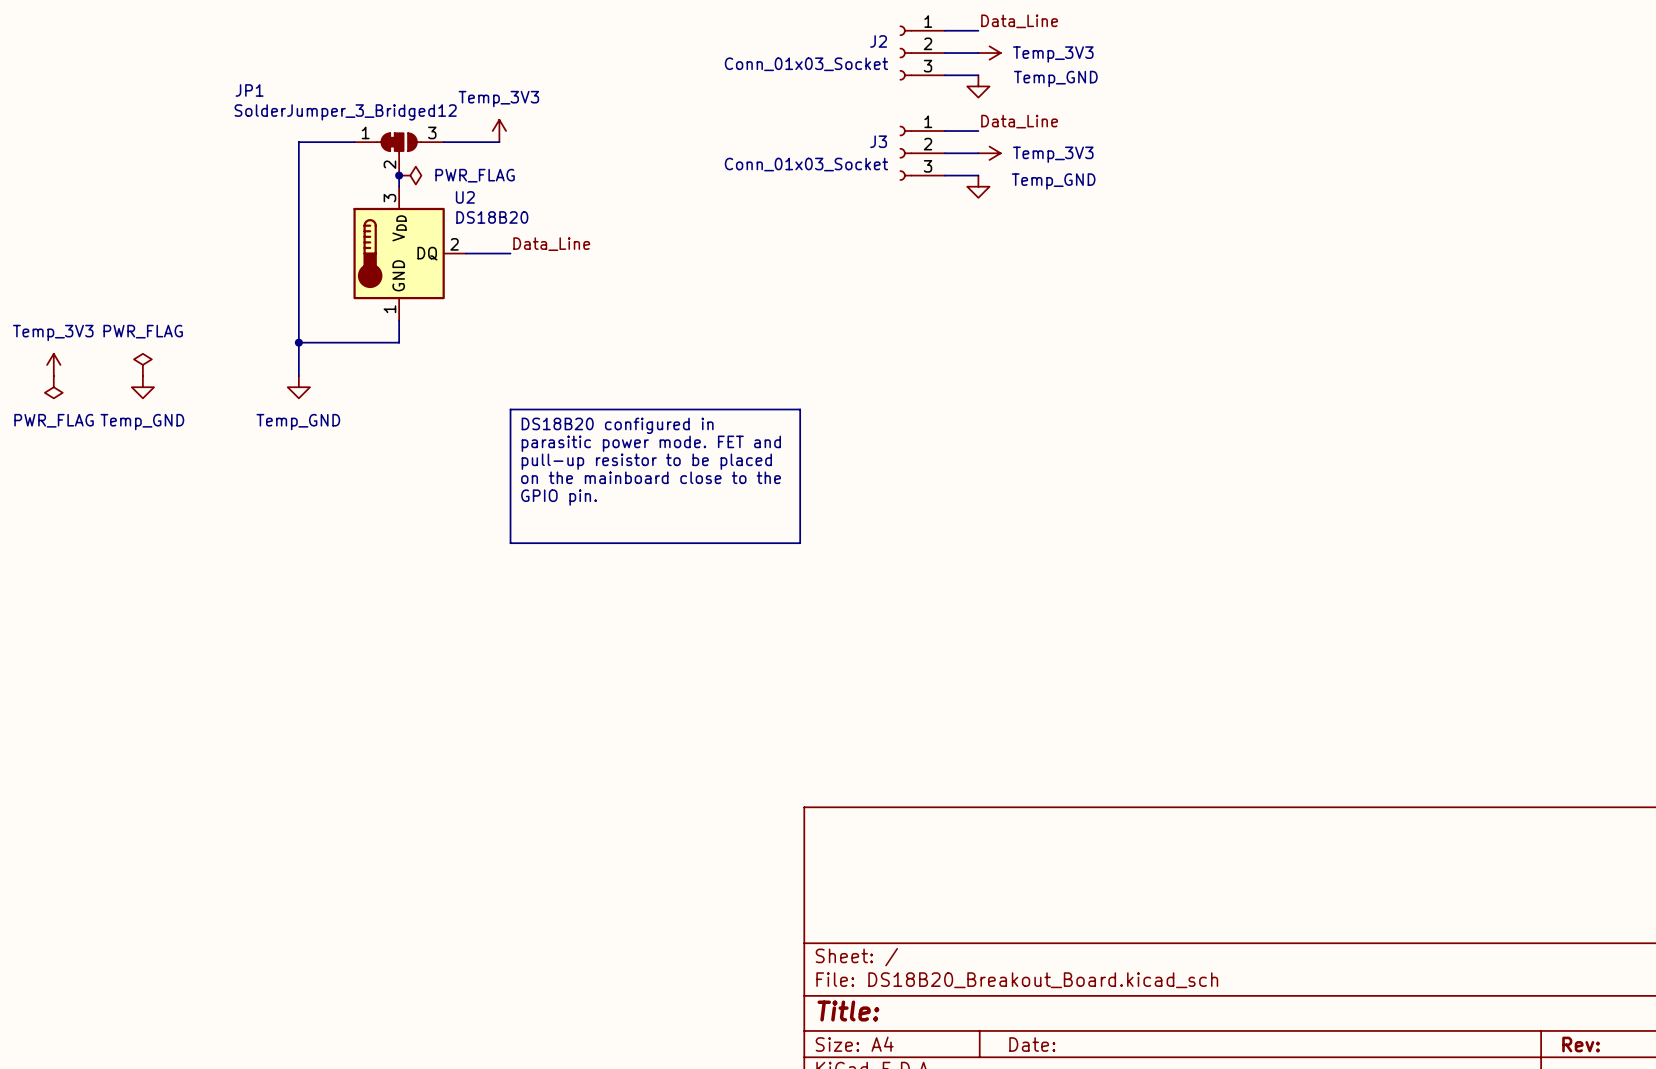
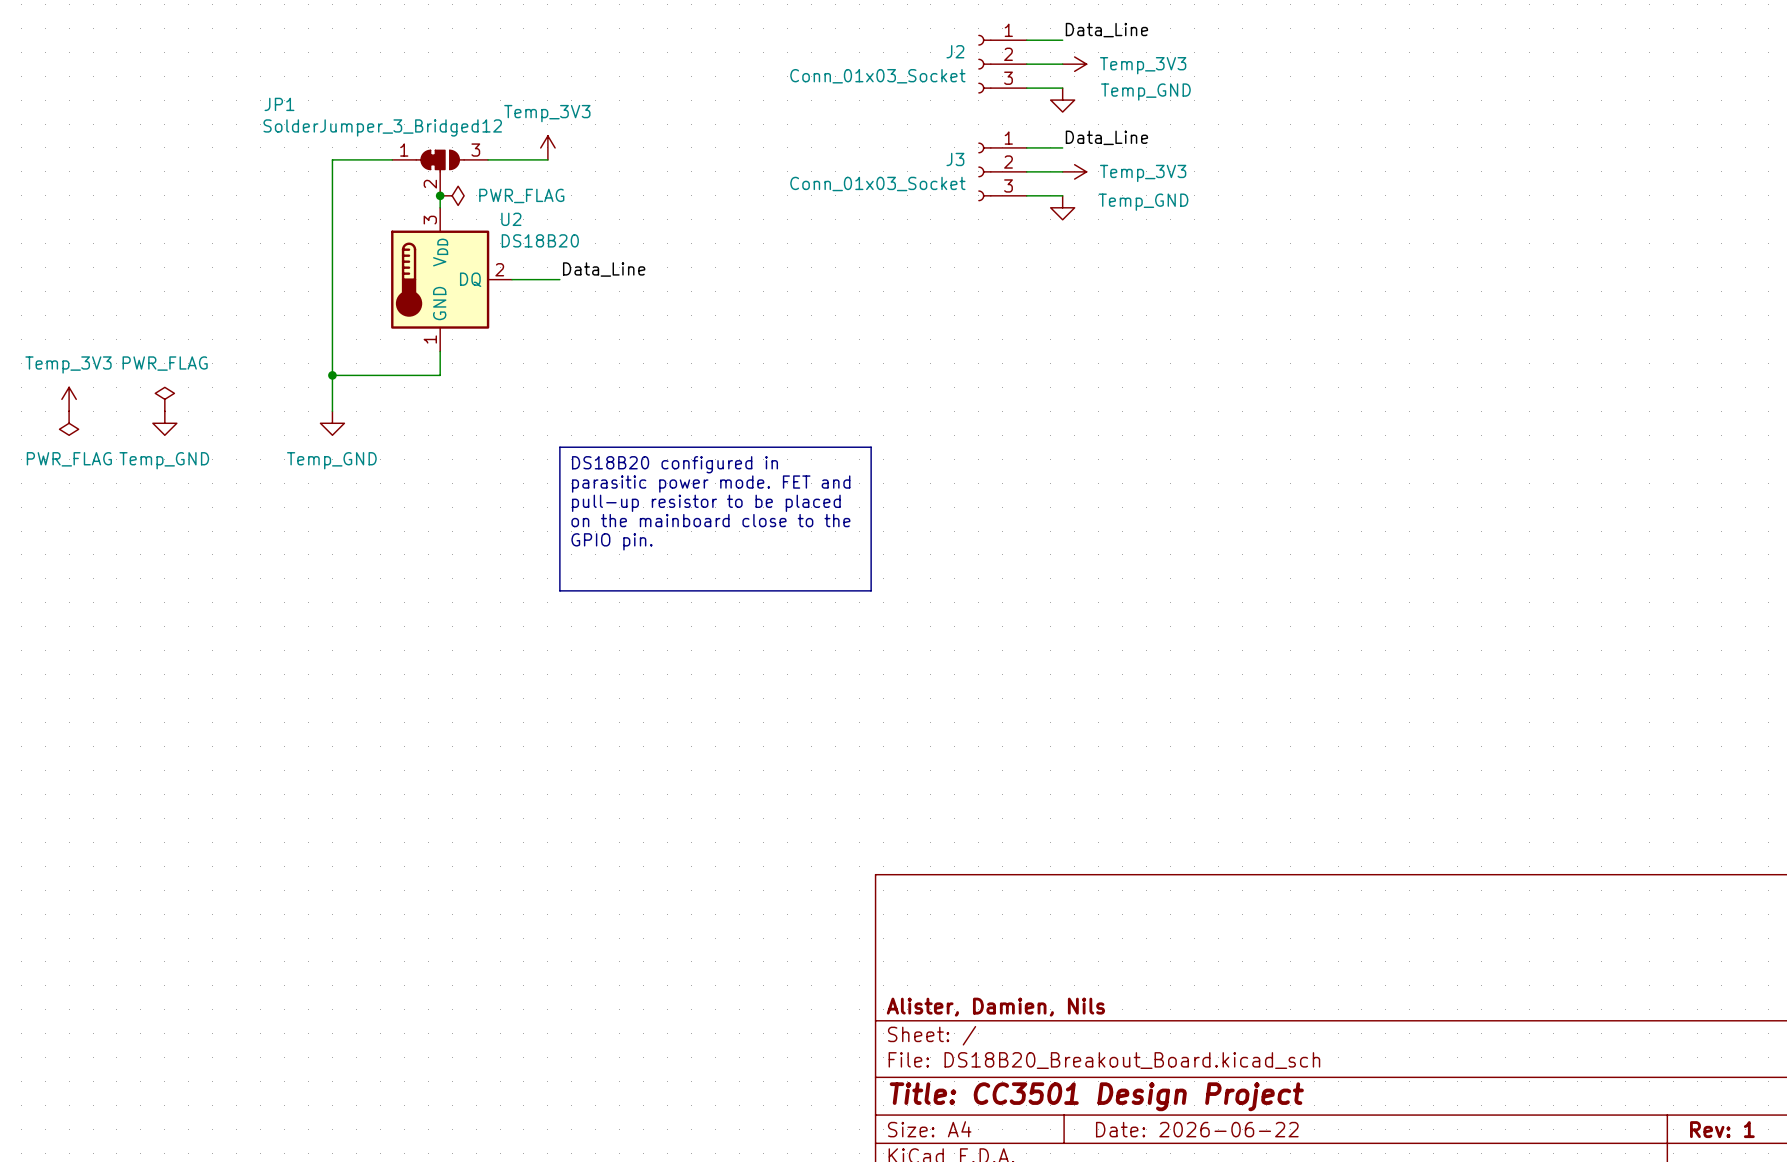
title block: none -> Alister, Damien, Nils (995, 1007)
title block: Title: (848, 1011) -> Title: CC3501 Design Project (1096, 1096)
title block: Date: (1032, 1044) -> Date: 2026-06-22 (1197, 1129)
title block: Rev: (1581, 1044) -> Rev: 1 (1722, 1129)

